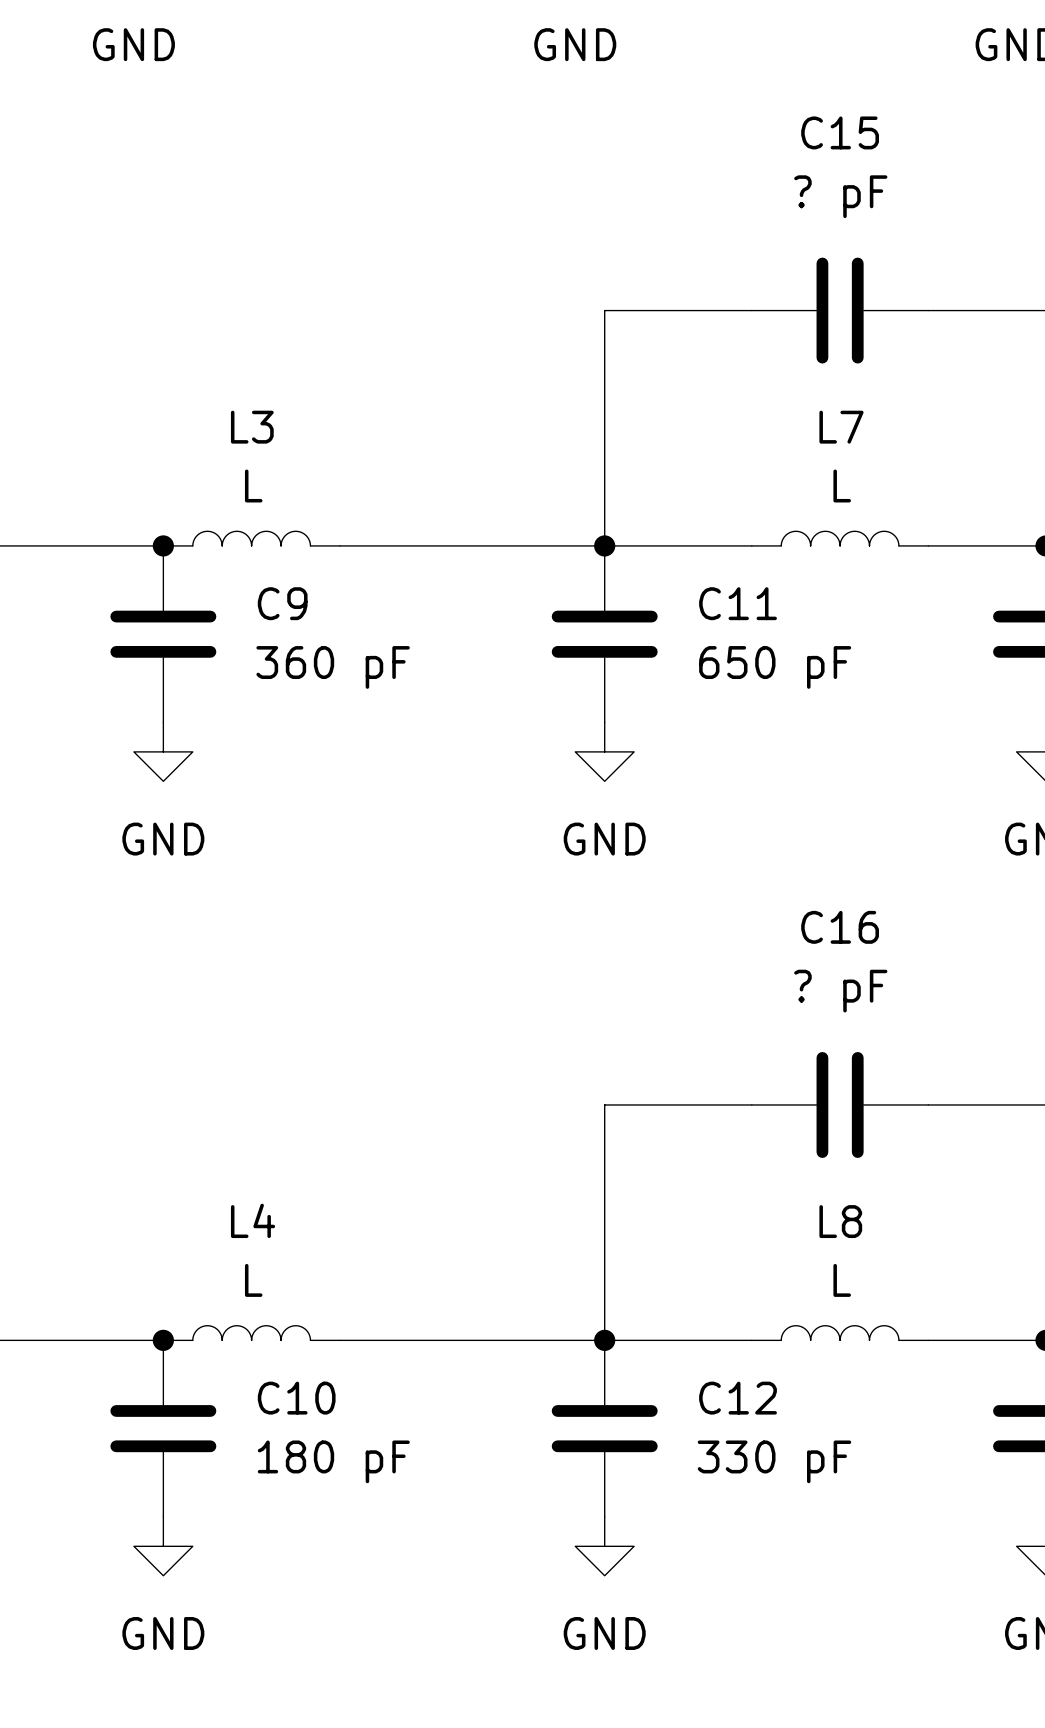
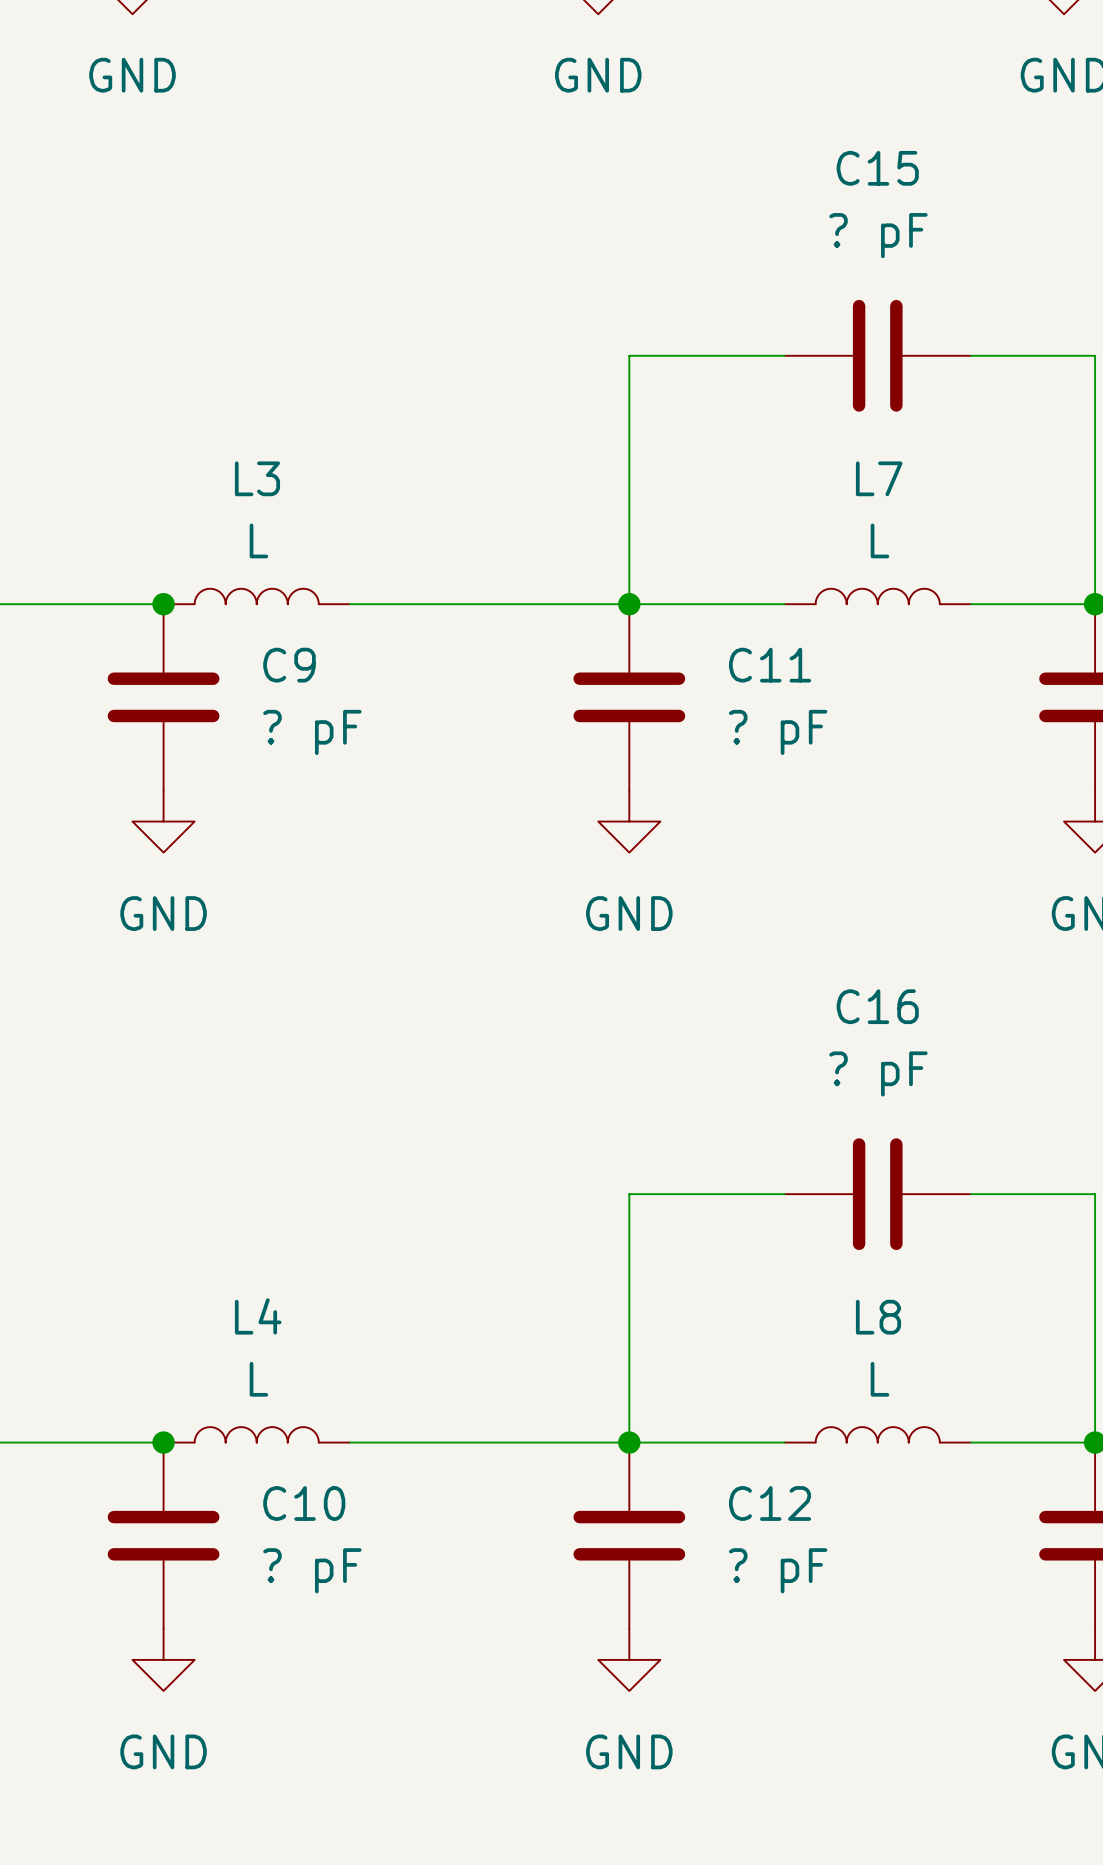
C9 value: 360 pF (333, 667) -> ? pF (312, 732)
C11 value: 650 pF (775, 667) -> ? pF (778, 732)
C10 value: 180 pF (333, 1461) -> ? pF (312, 1570)
C12 value: 330 pF (774, 1461) -> ? pF (778, 1570)

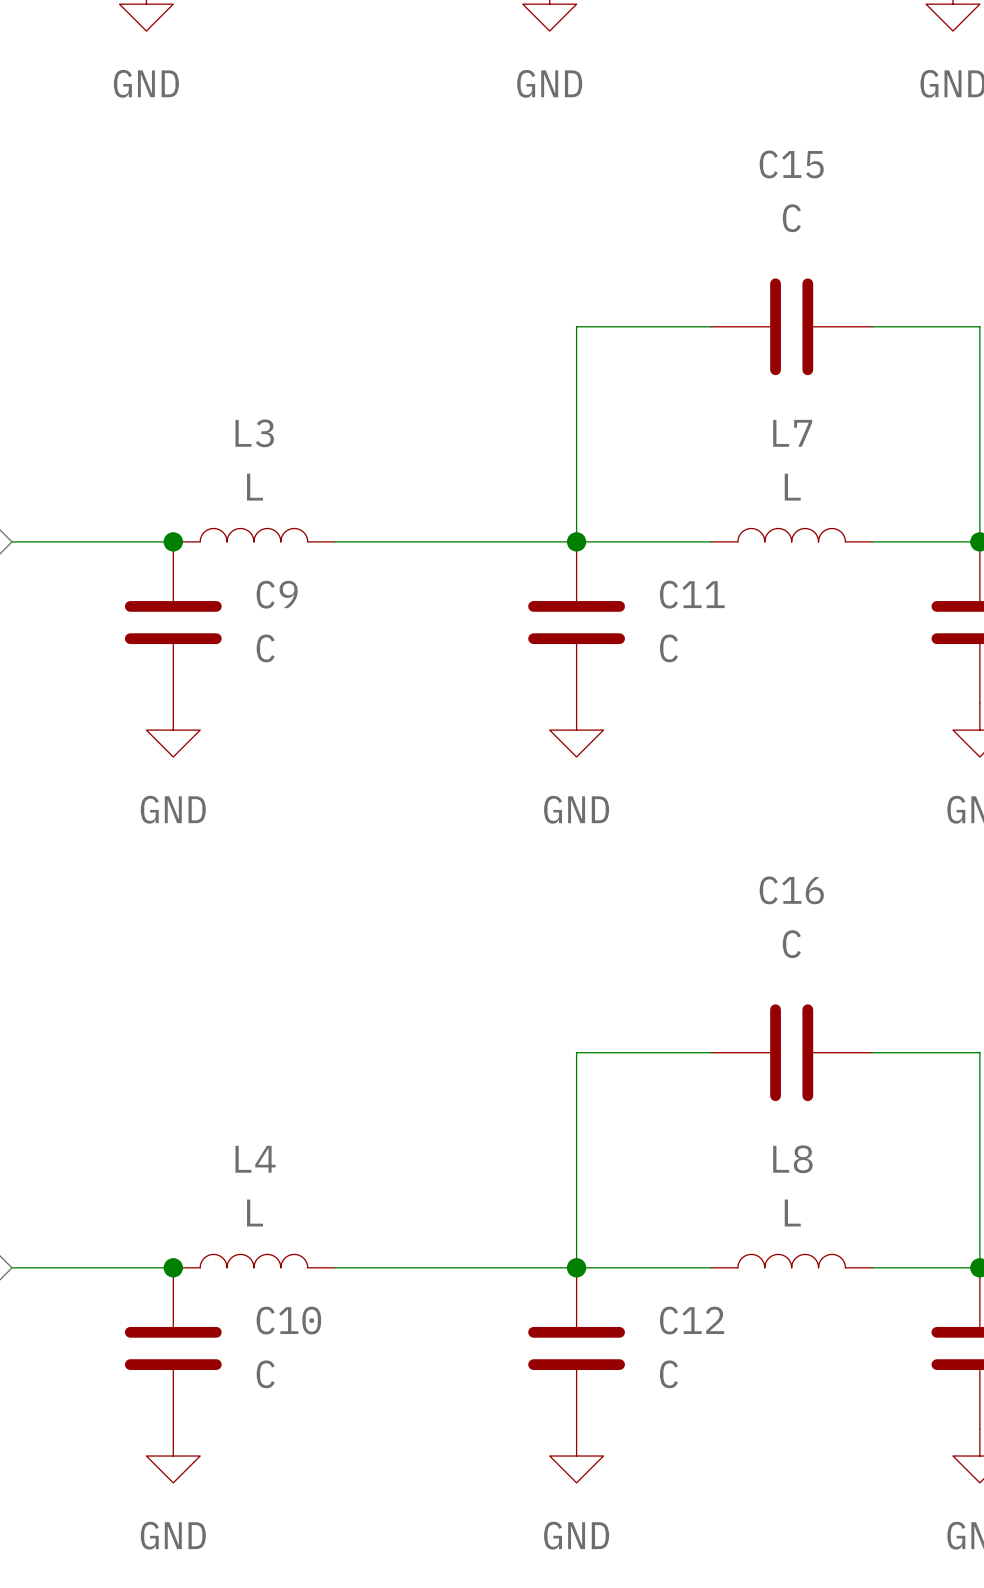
C15 value: ? pF (878, 235) -> C (791, 218)
C9 value: ? pF (312, 732) -> C (265, 648)
C11 value: ? pF (778, 732) -> C (668, 648)
C16 value: ? pF (878, 1073) -> C (791, 944)
C10 value: ? pF (312, 1570) -> C (265, 1374)
C12 value: ? pF (778, 1570) -> C (668, 1374)

